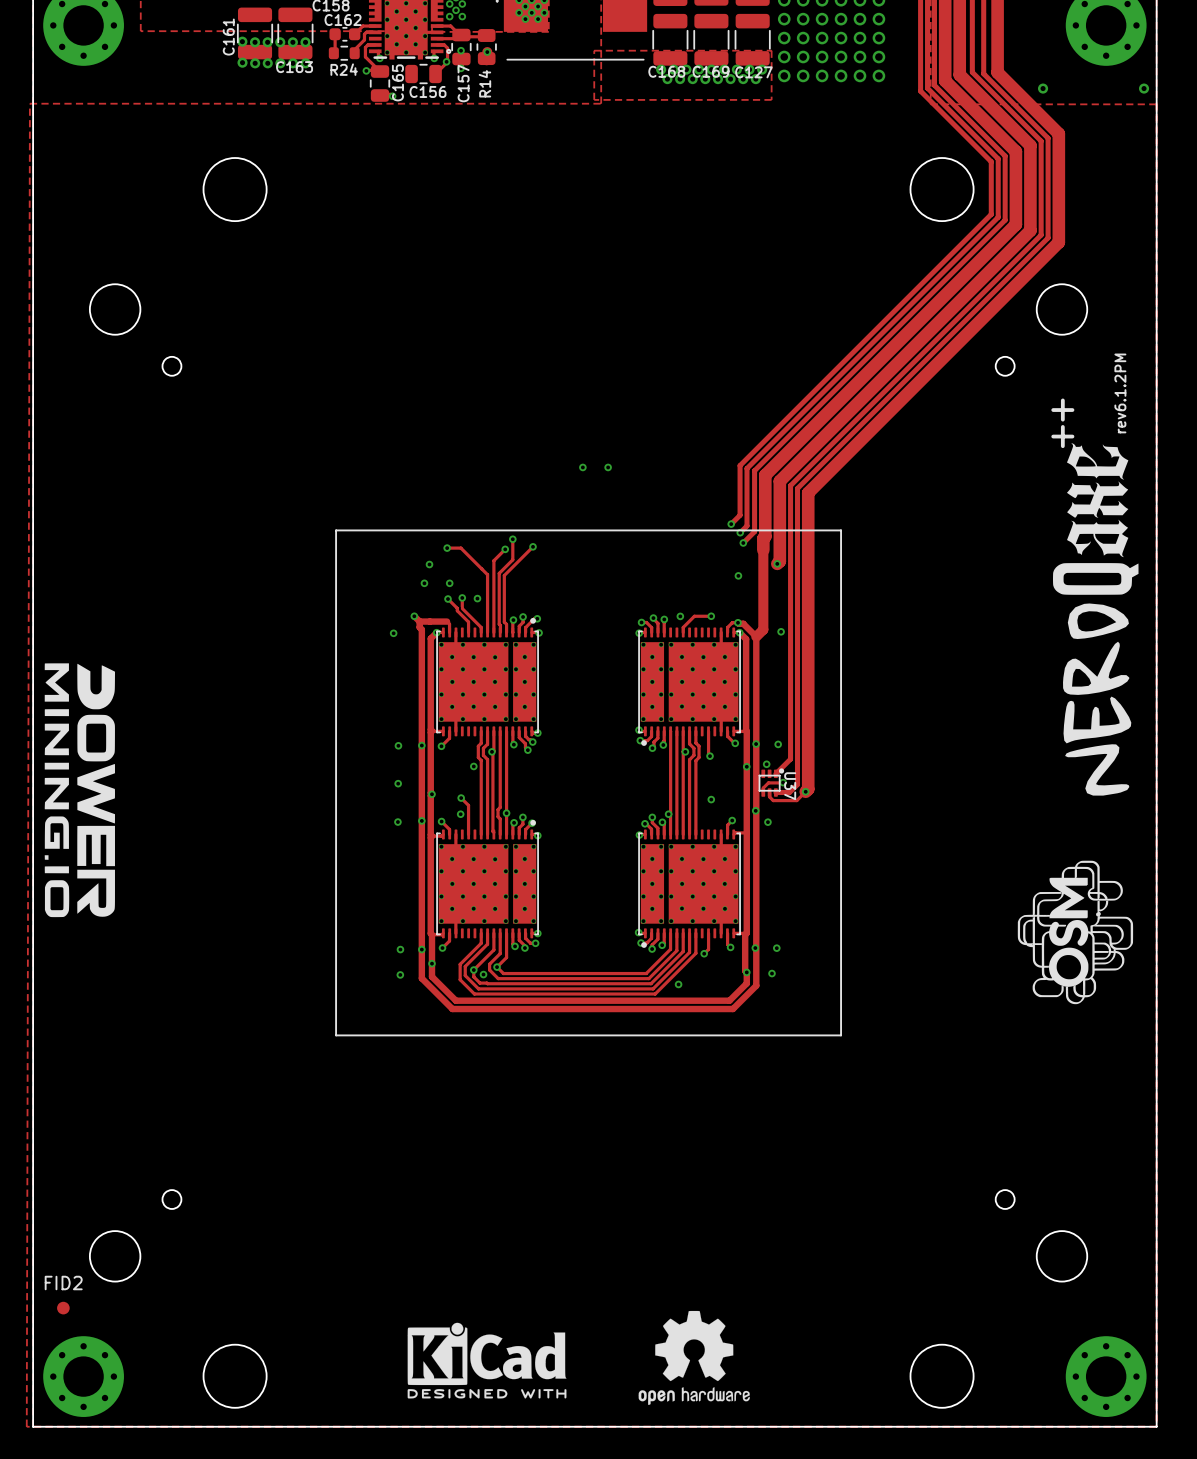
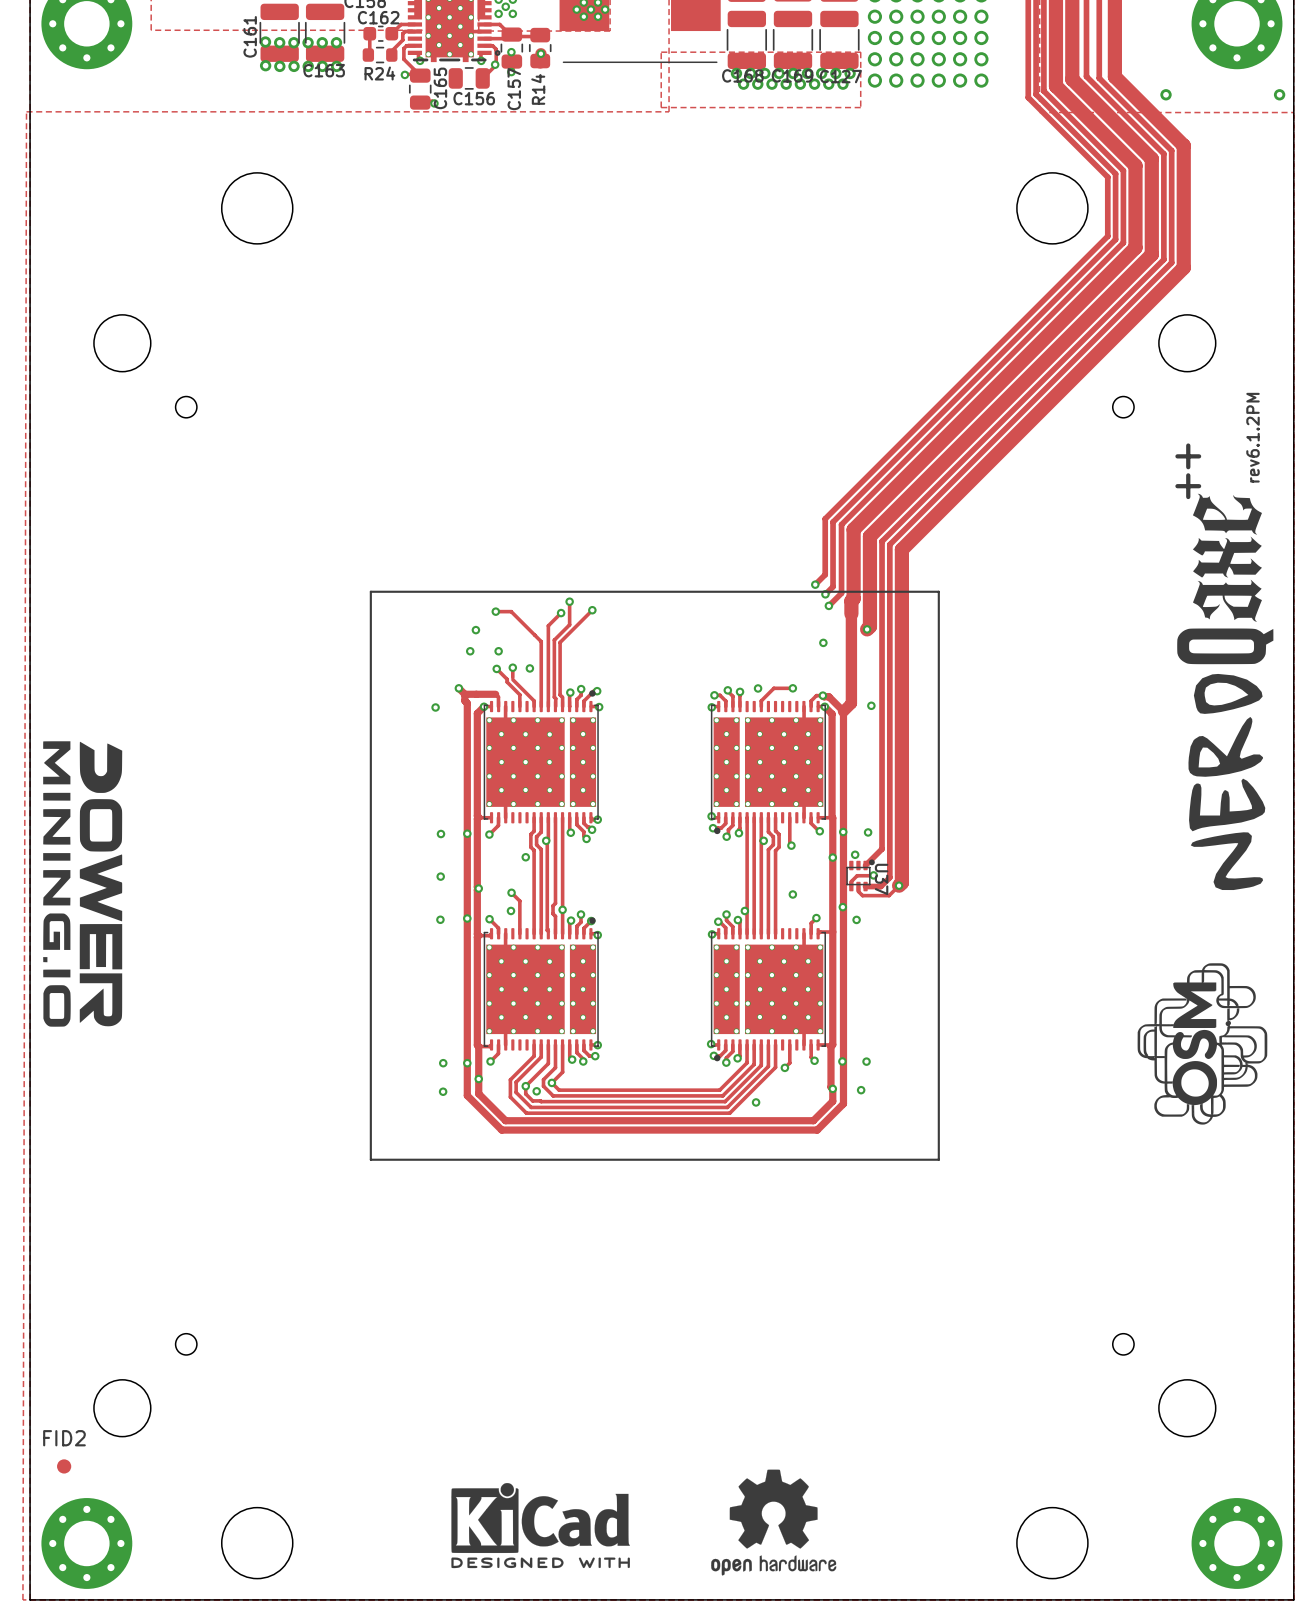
via: (582, 467) -> none
via: (608, 467) -> none

